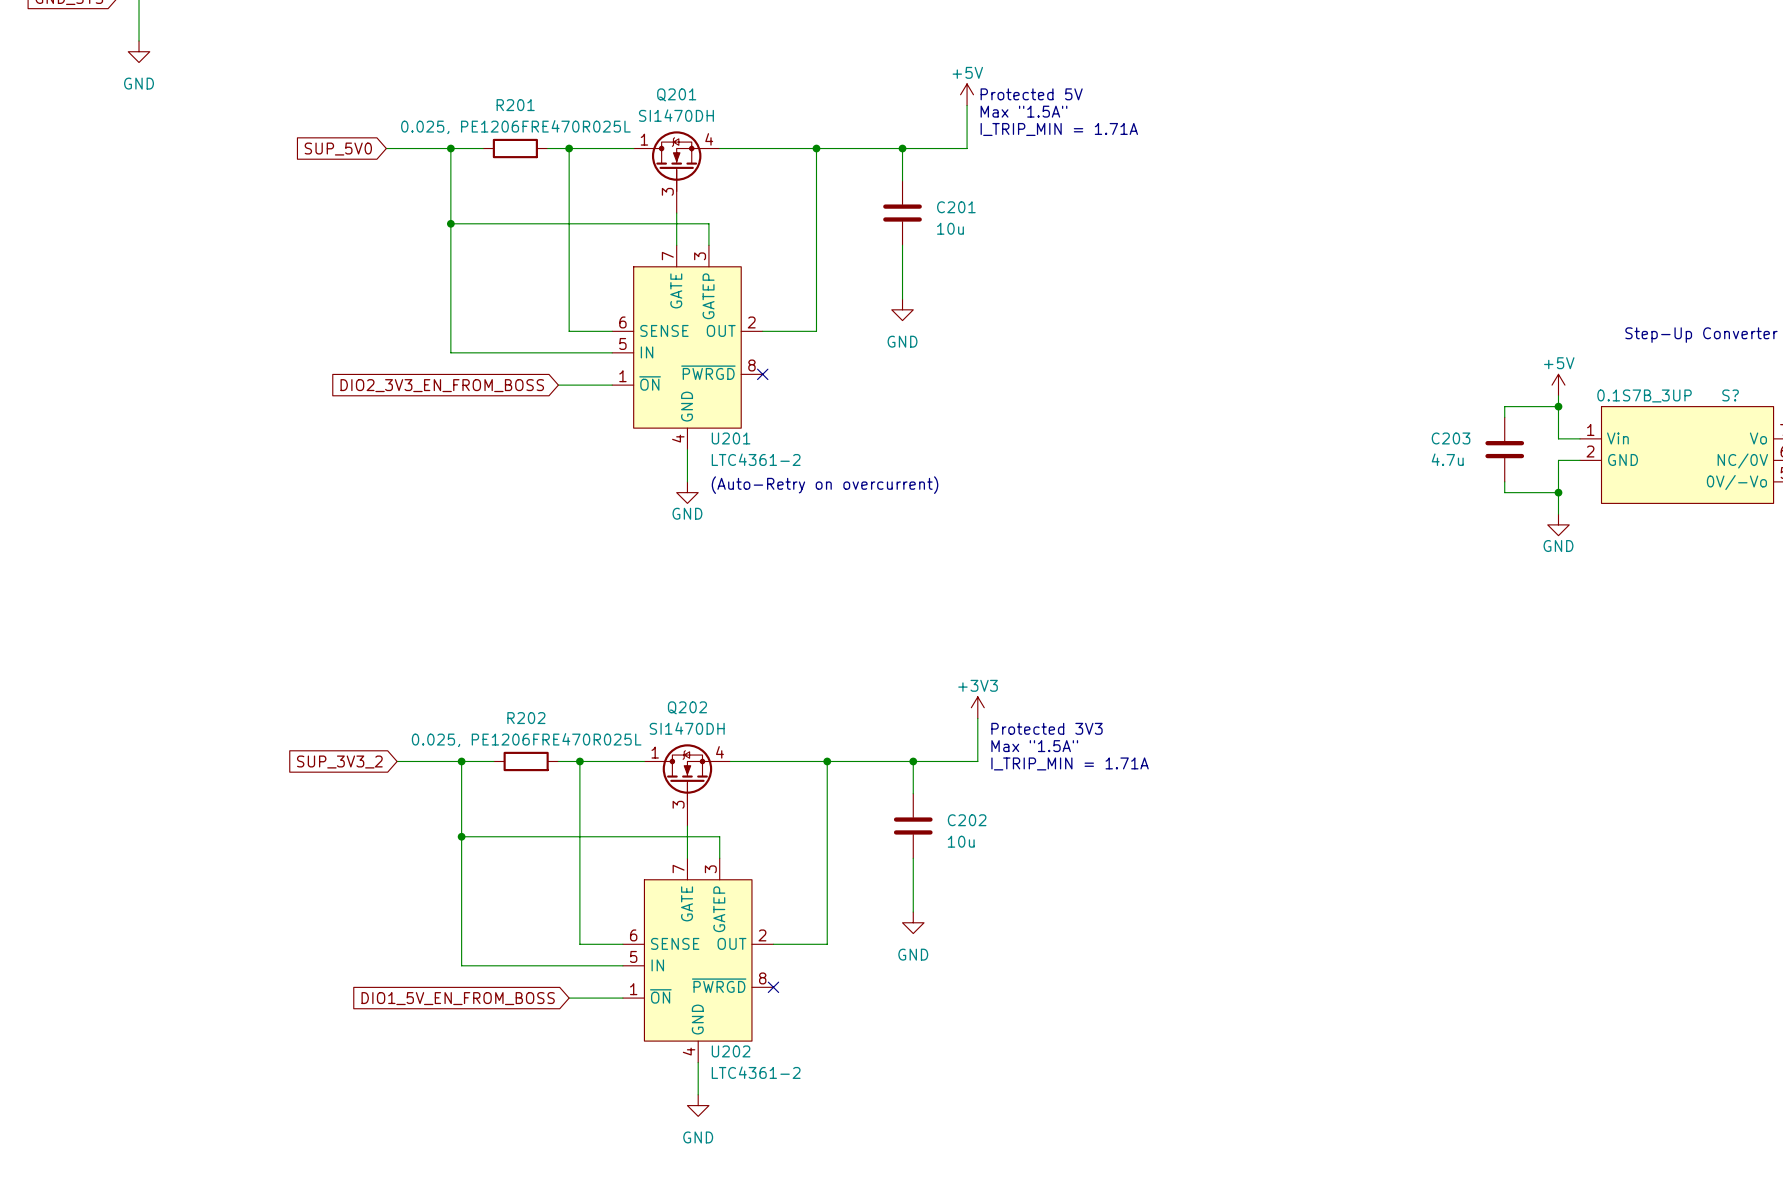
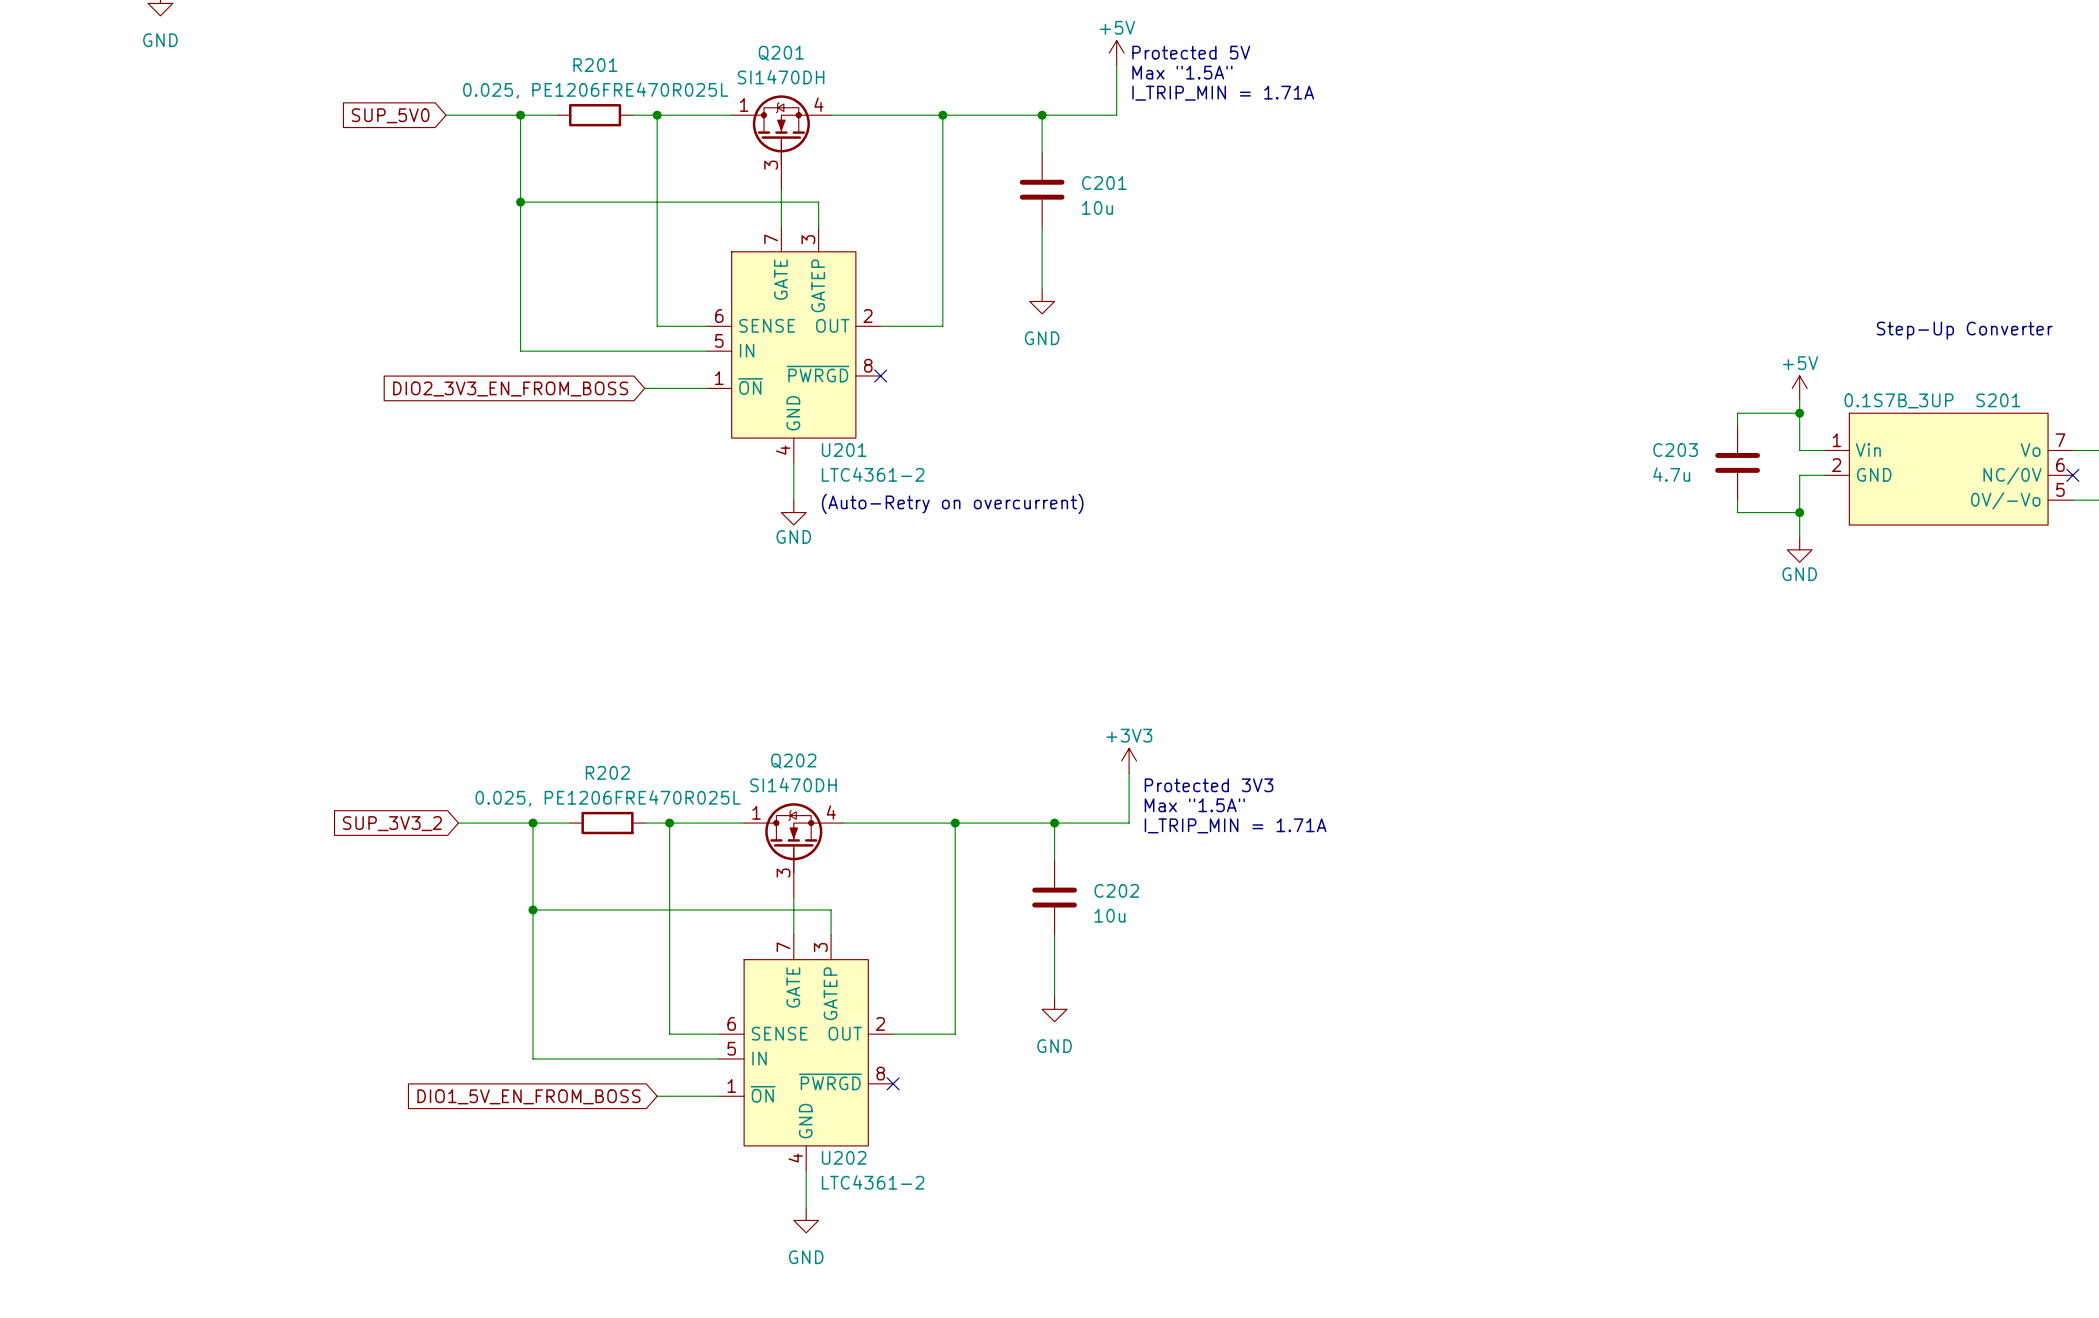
S? name: S? (1730, 395) -> S201 (1998, 400)

